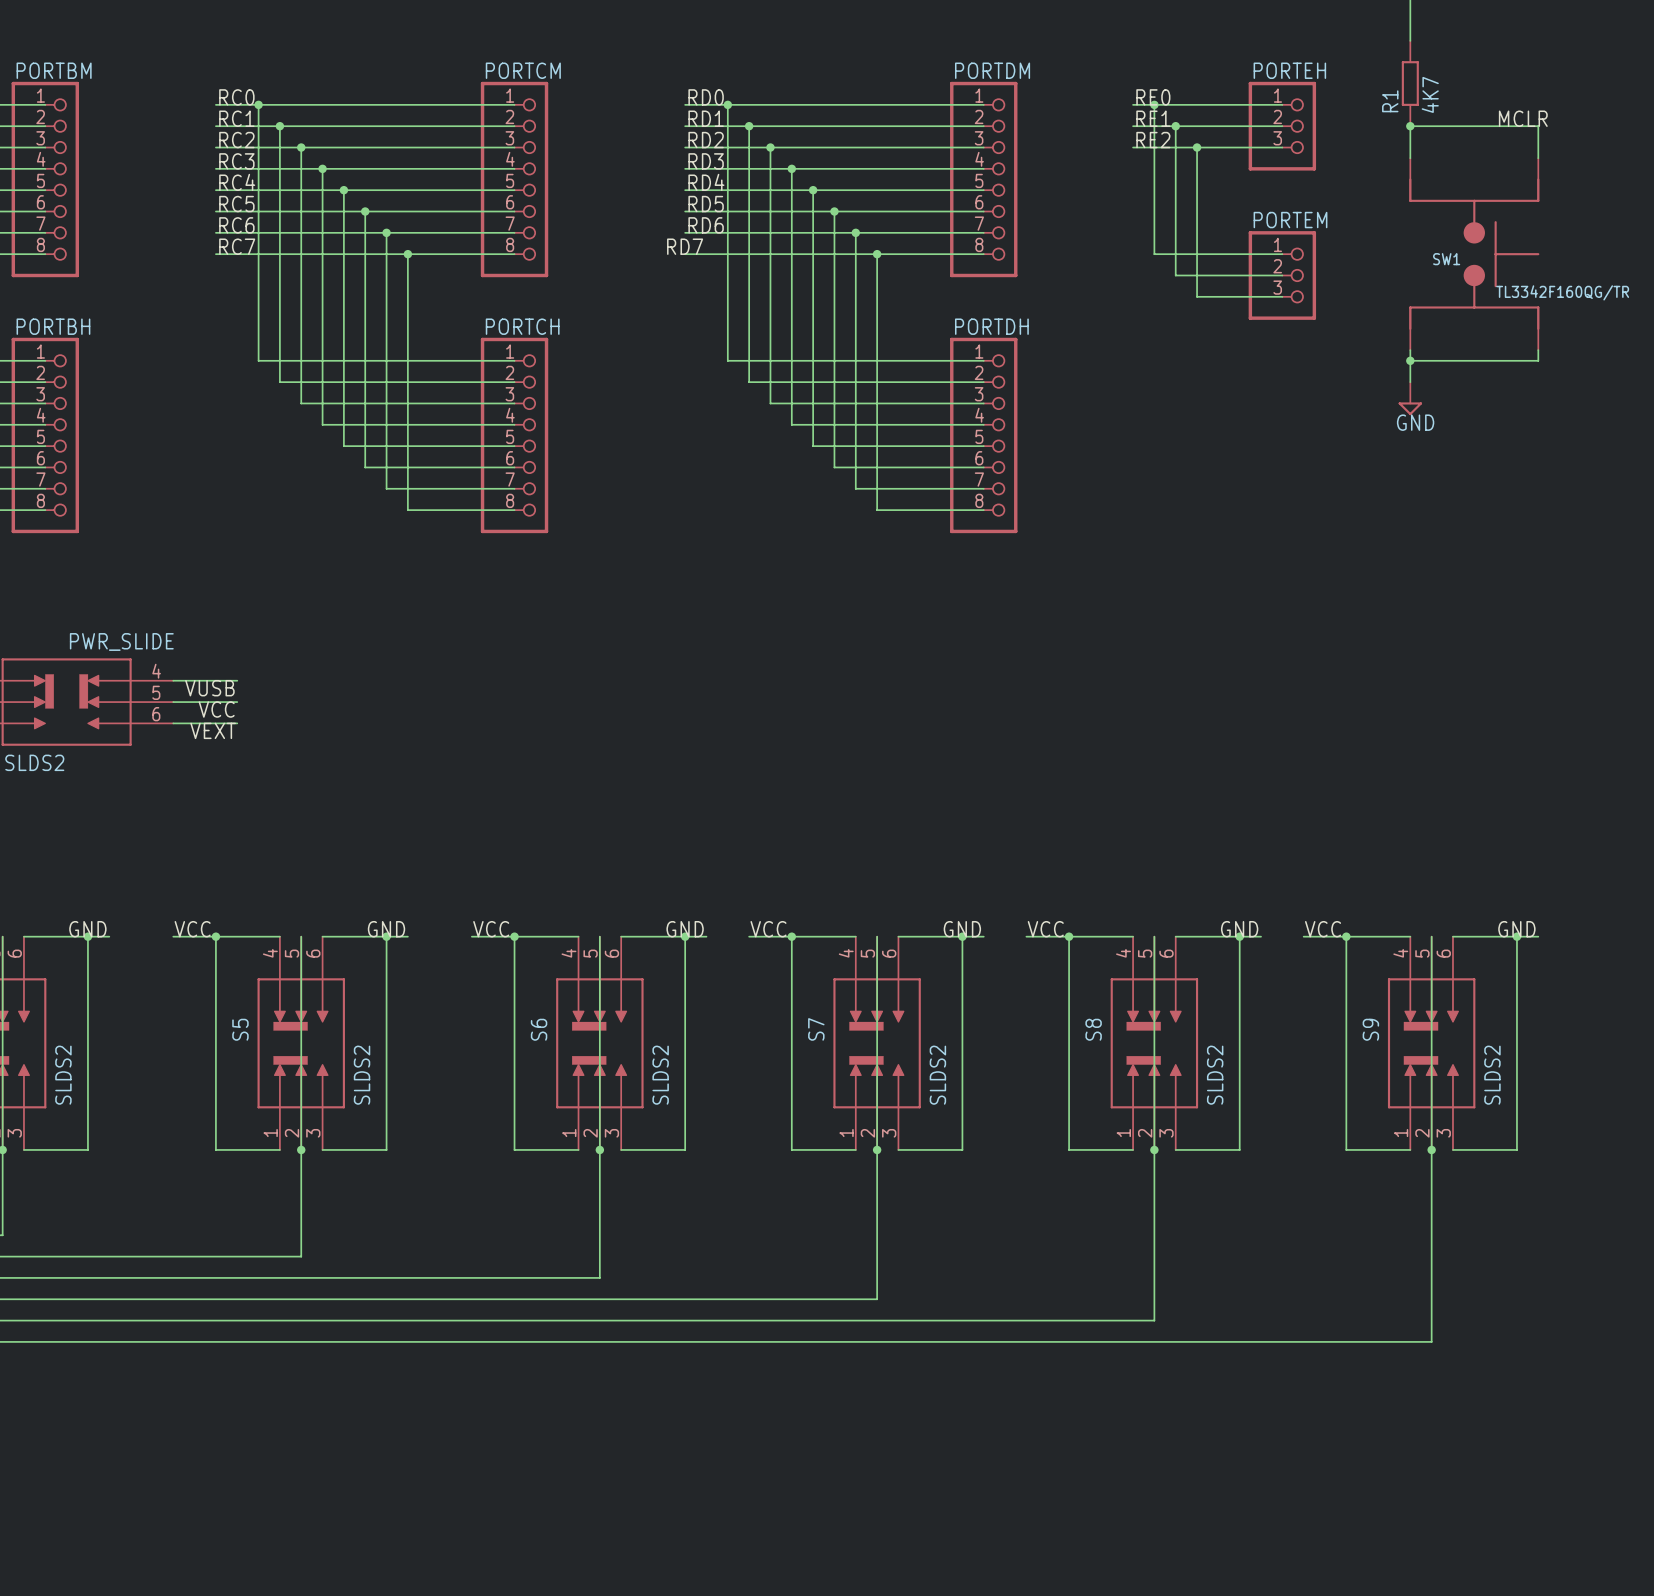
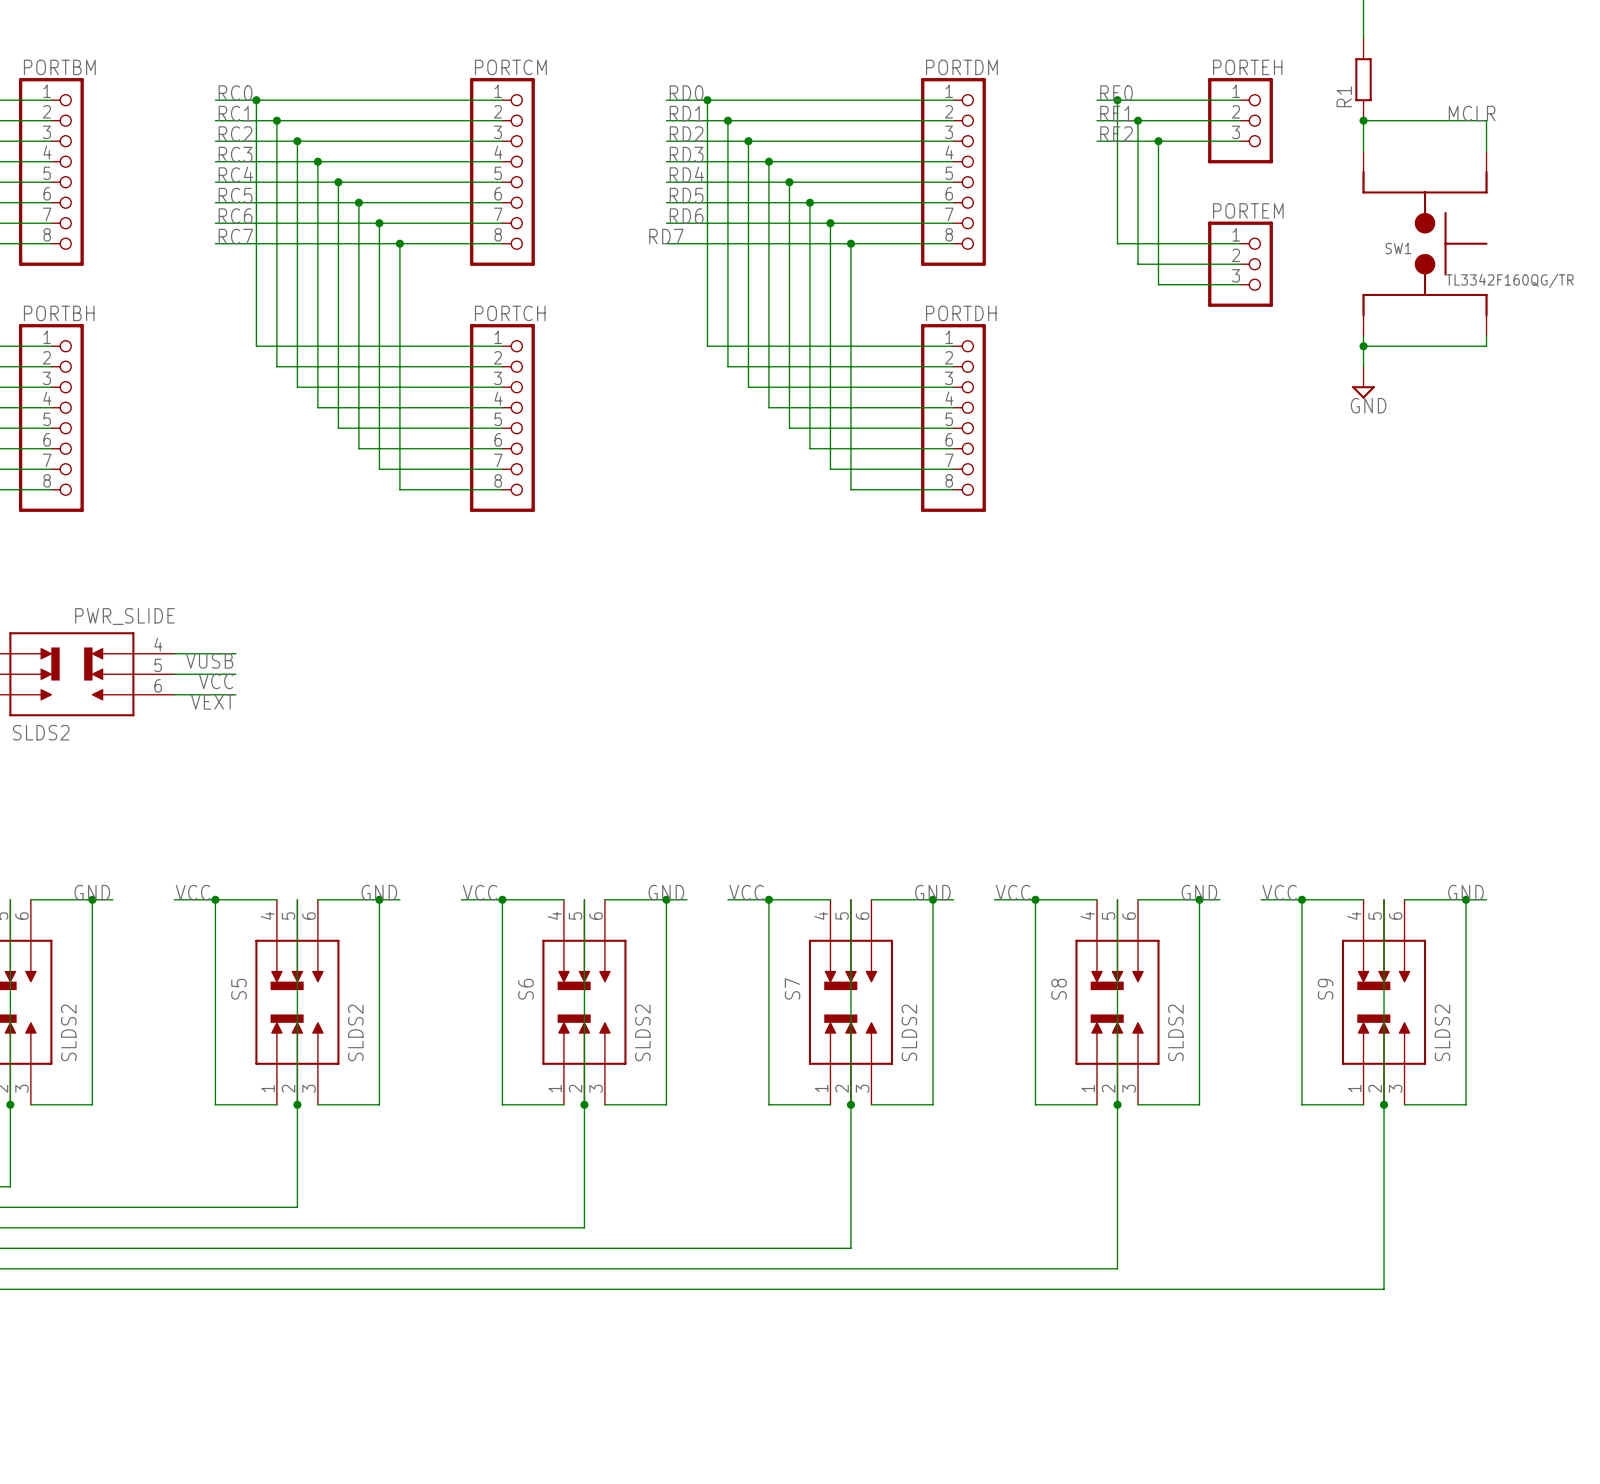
R1 value: 4K7 (1430, 94) -> none

